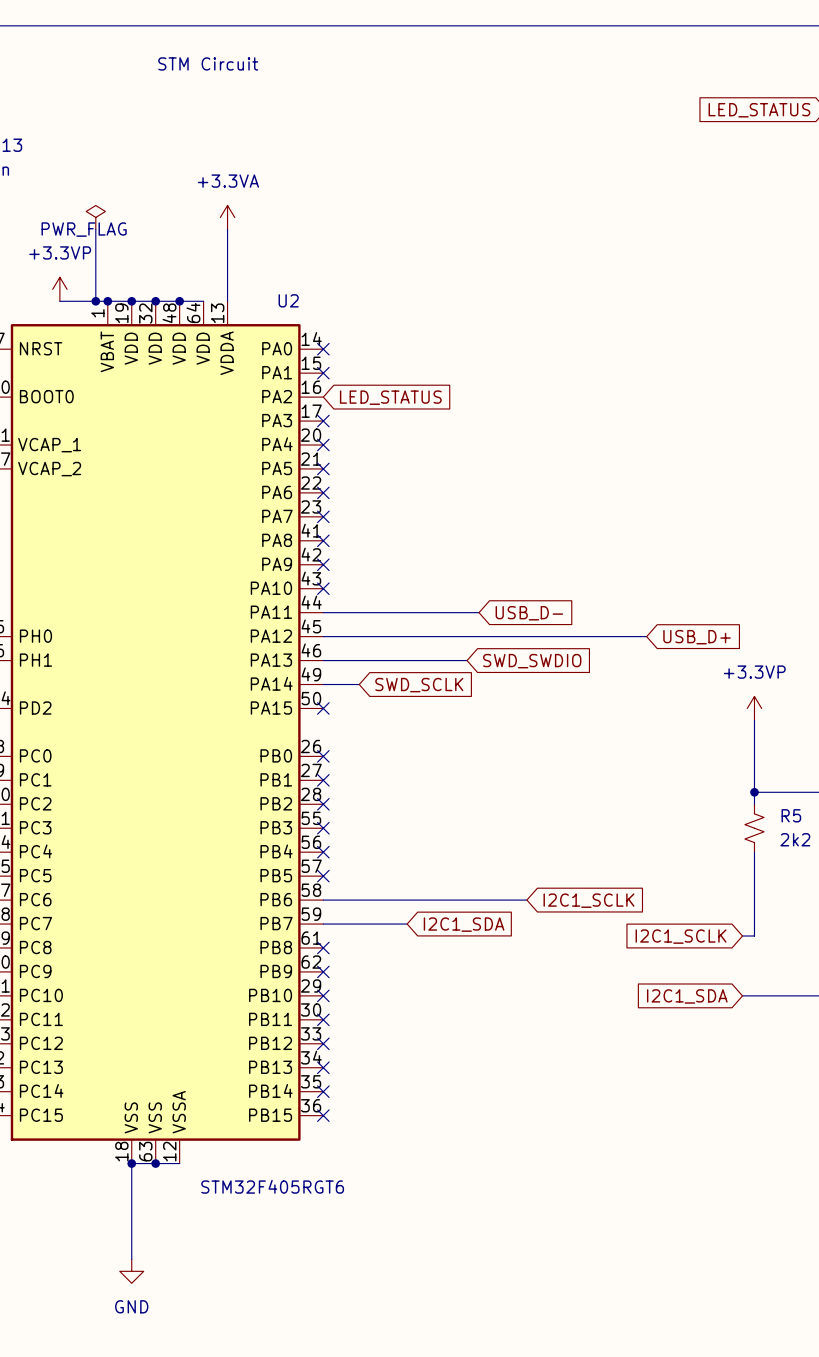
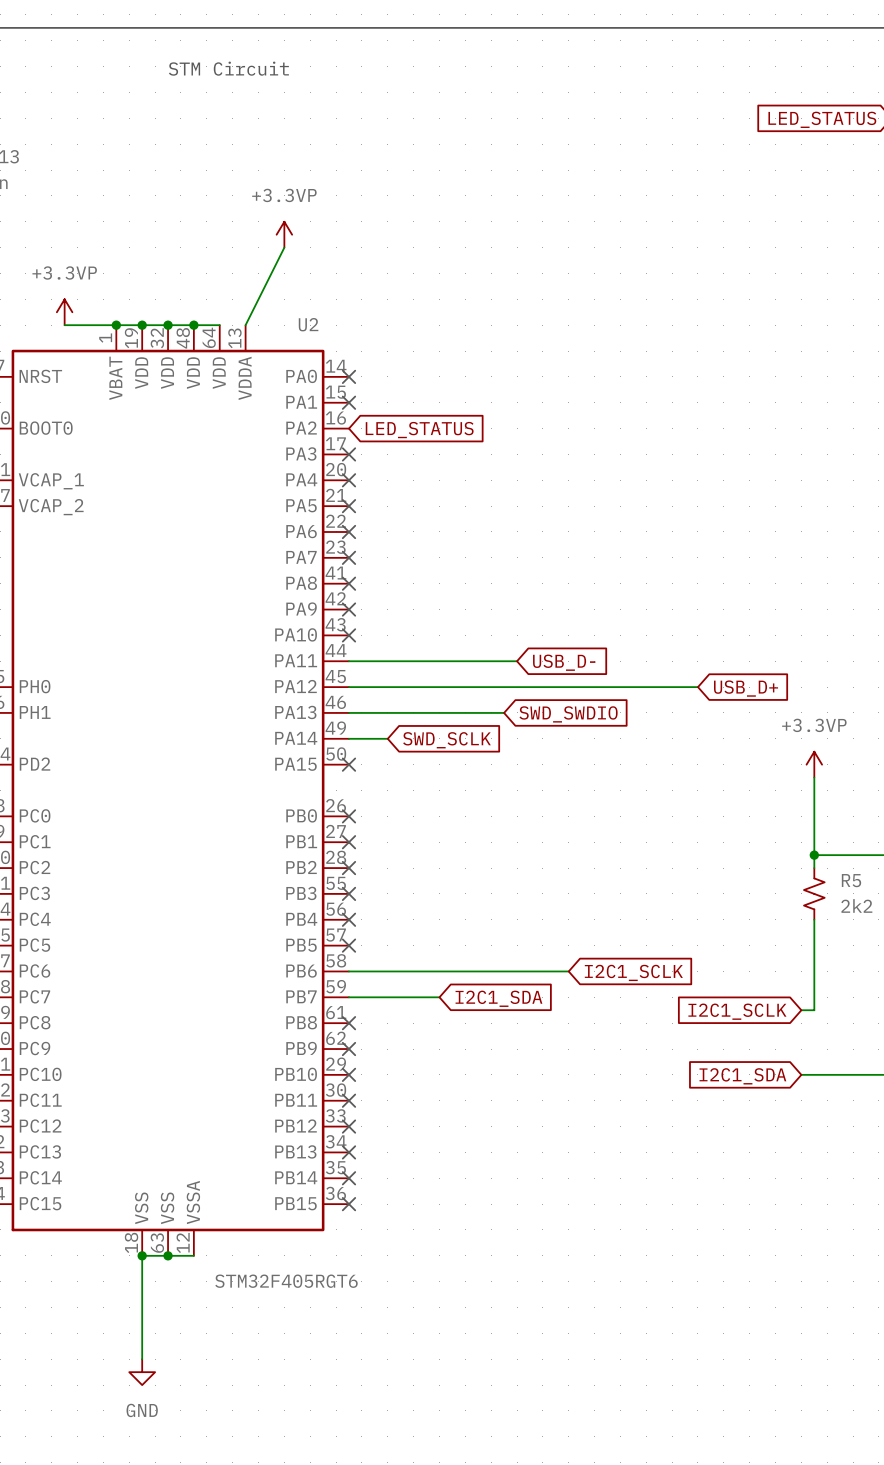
power symbol: PWR_FLAG (95, 217) -> none
power symbol: +3.3VA (227, 217) -> none
power symbol: none -> +3.3VP (284, 234)
wire: (95, 229) (95, 301) -> none
wire: (227, 229) (227, 301) -> (284, 247) (245, 325)
junction: (95, 301) -> none

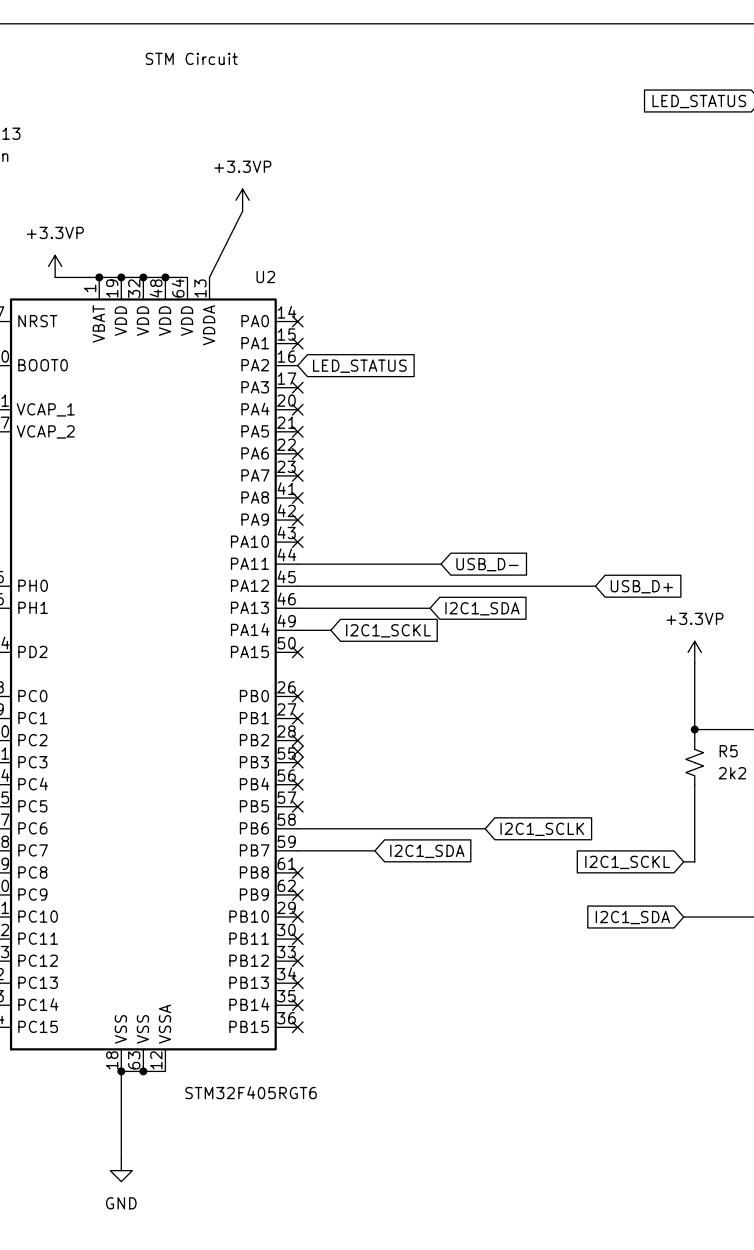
global label: SWD_SWDIO (568, 714) -> I2C1_SDA (482, 608)
global label: SWD_SCLK (446, 740) -> I2C1_SCKL (388, 630)
no-connect mark: none -> (297, 751)
global label: I2C1_SCLK (737, 1011) -> I2C1_SCKL (627, 862)

